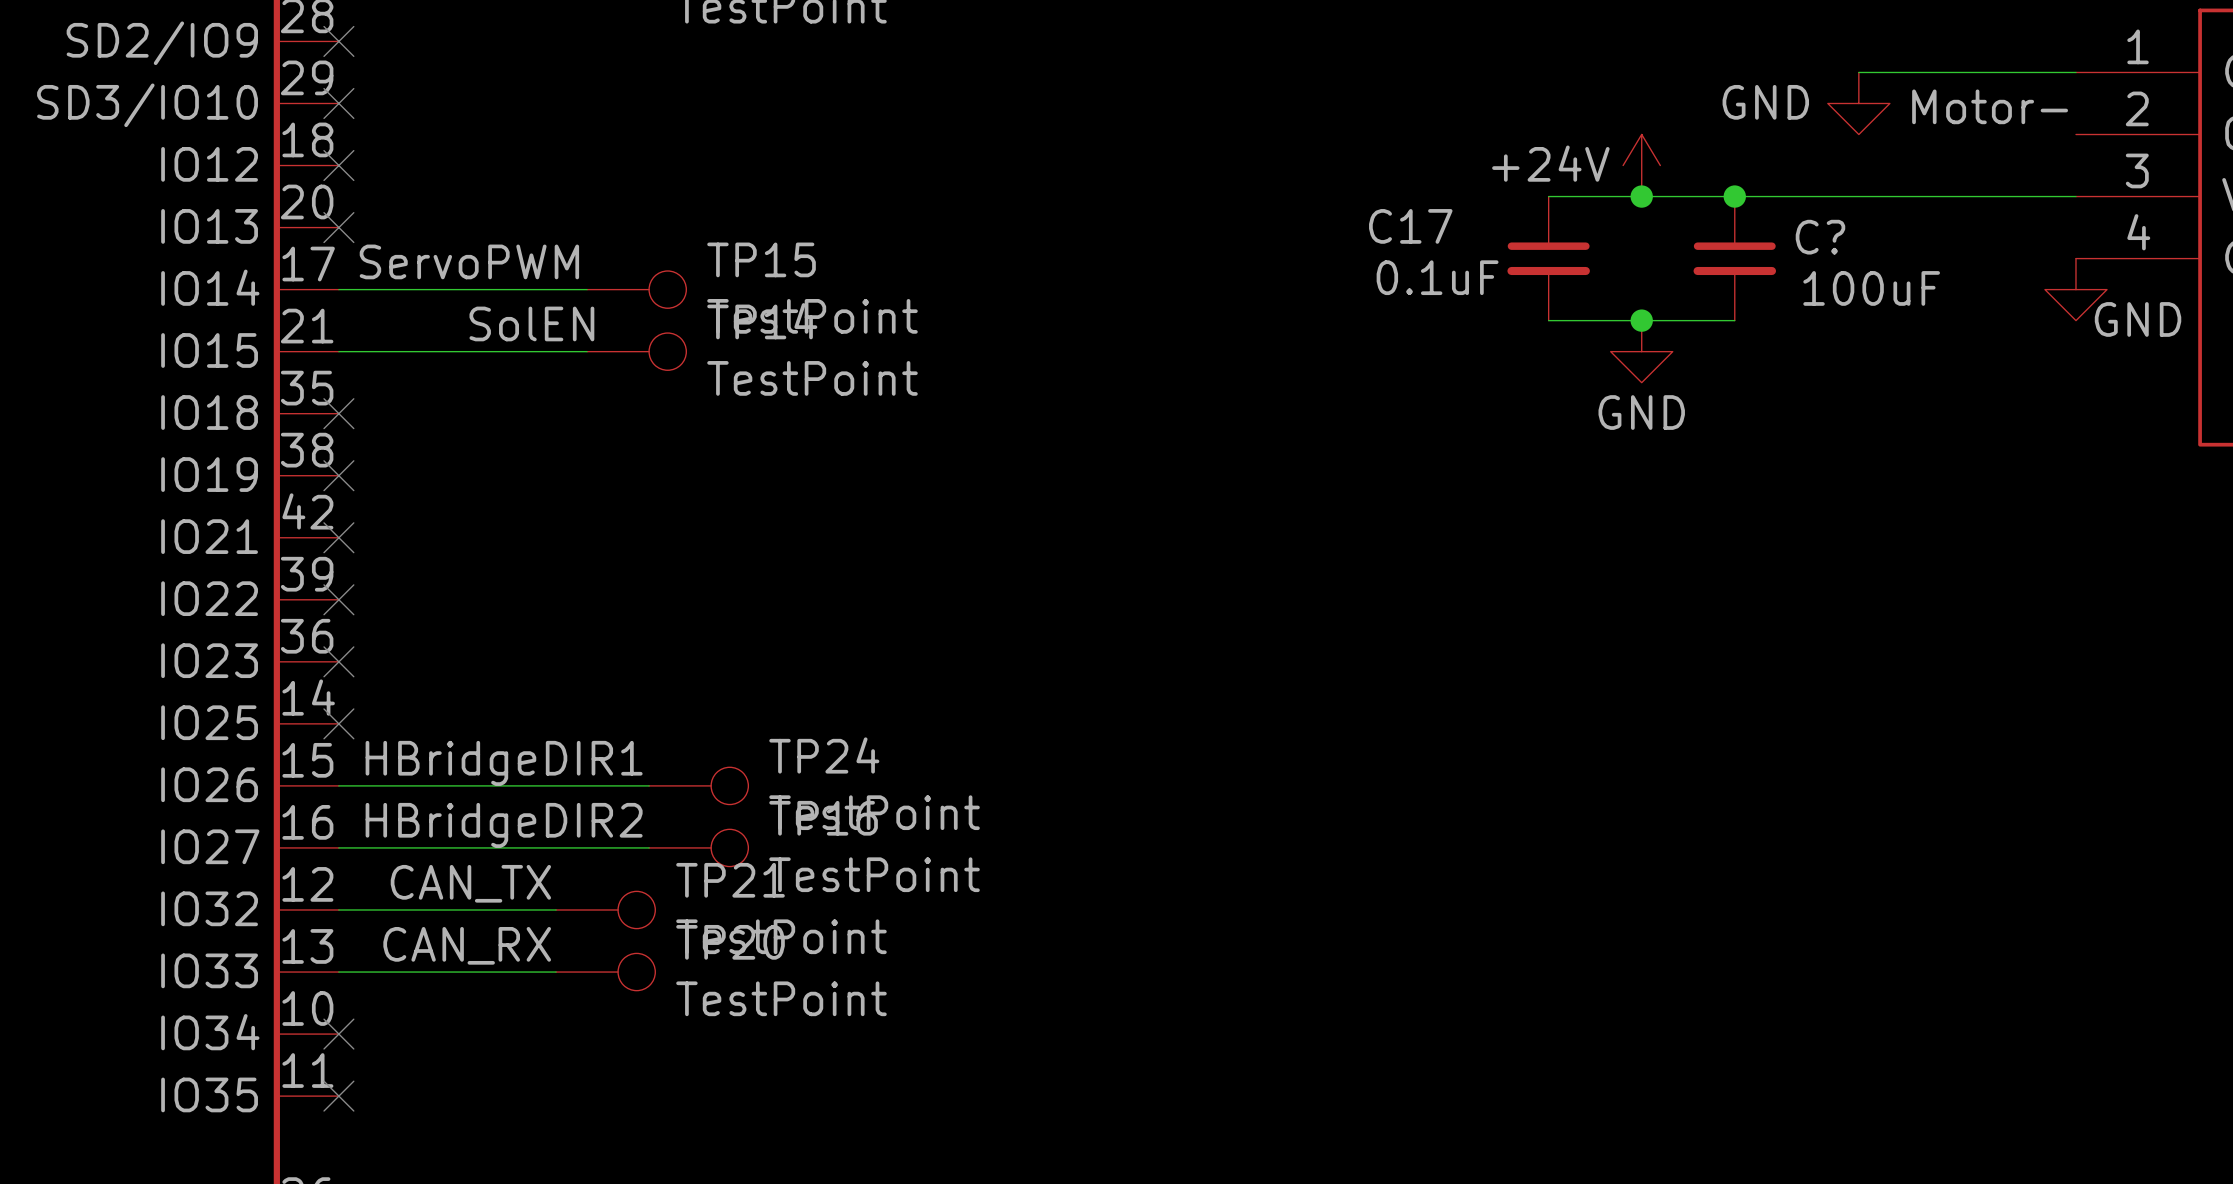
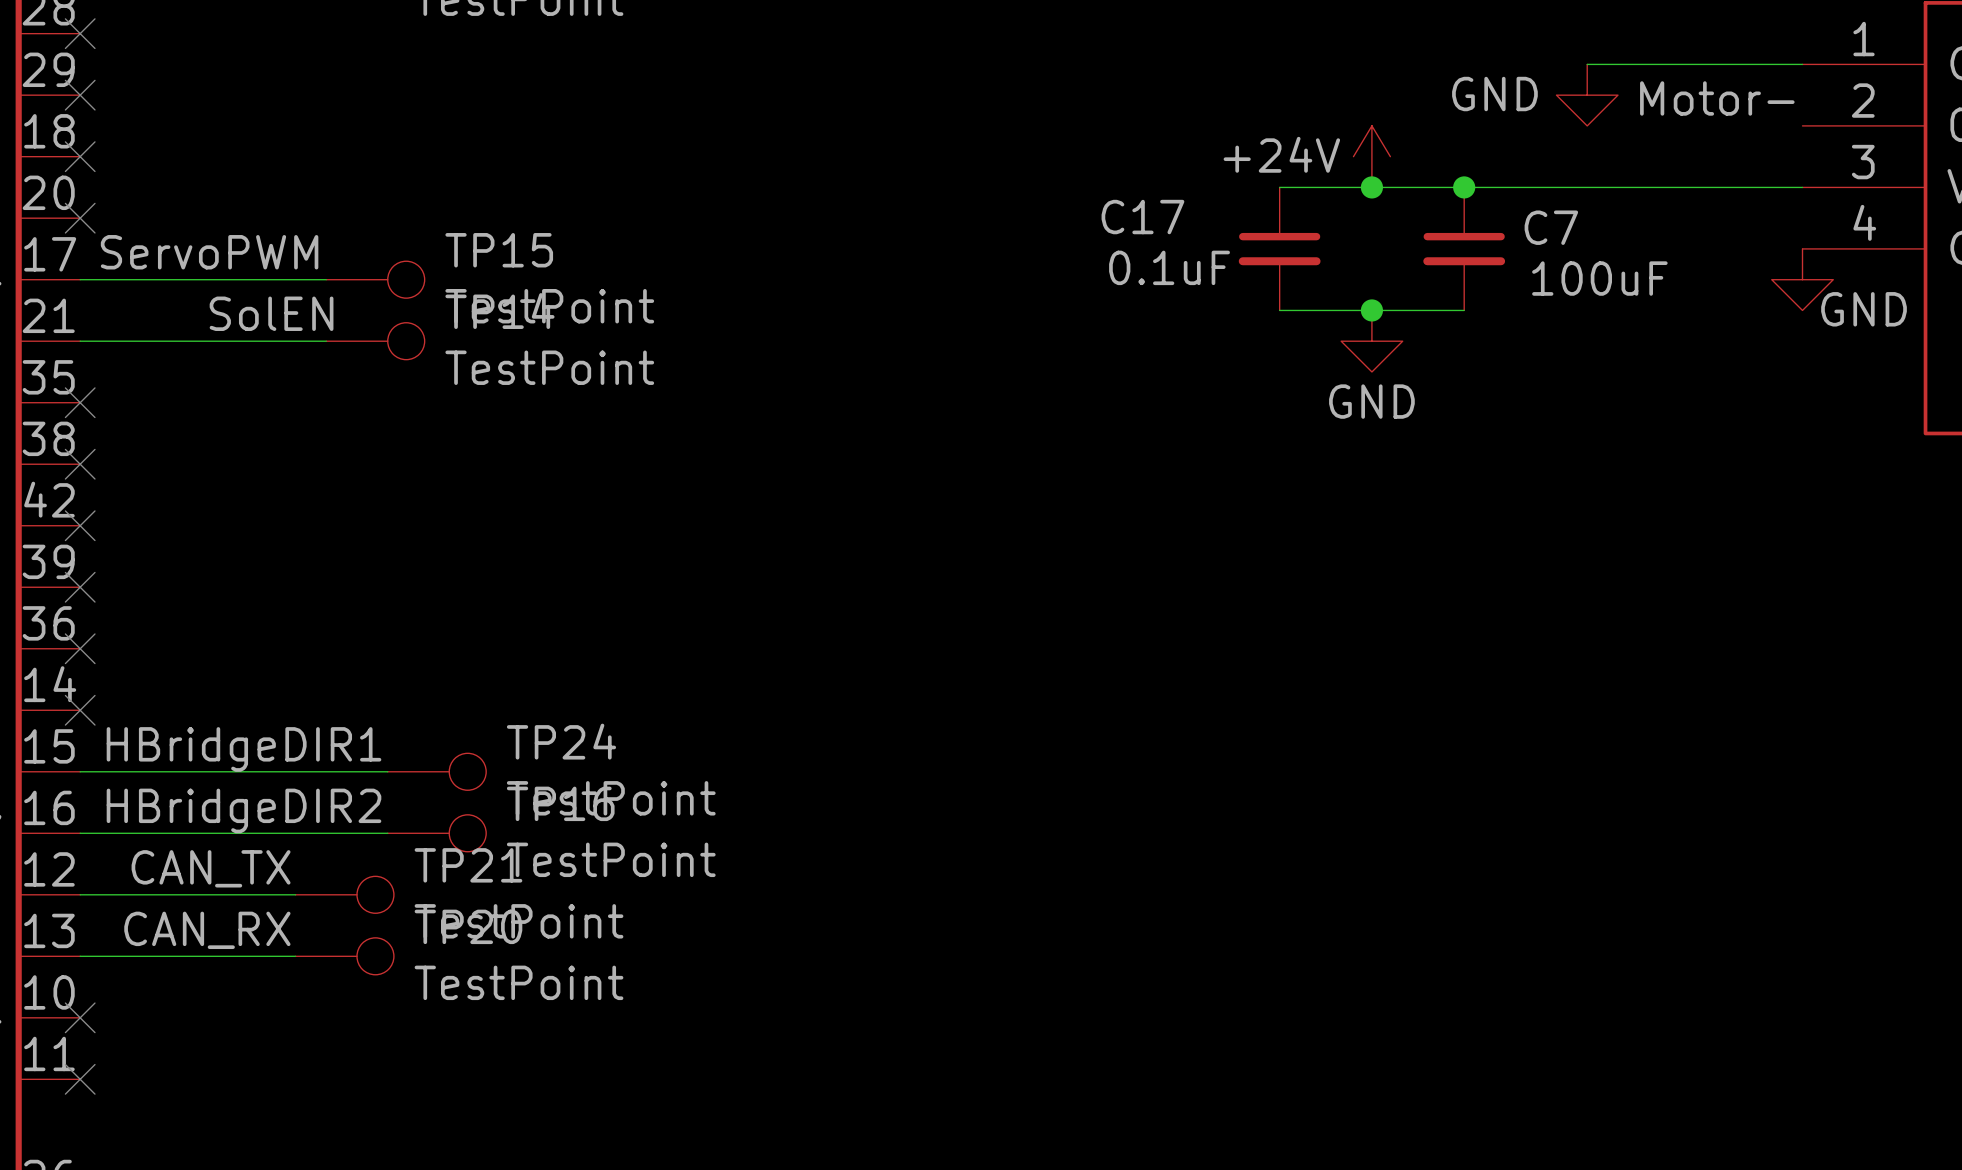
C? name: C? (1820, 237) -> C7 (1551, 227)

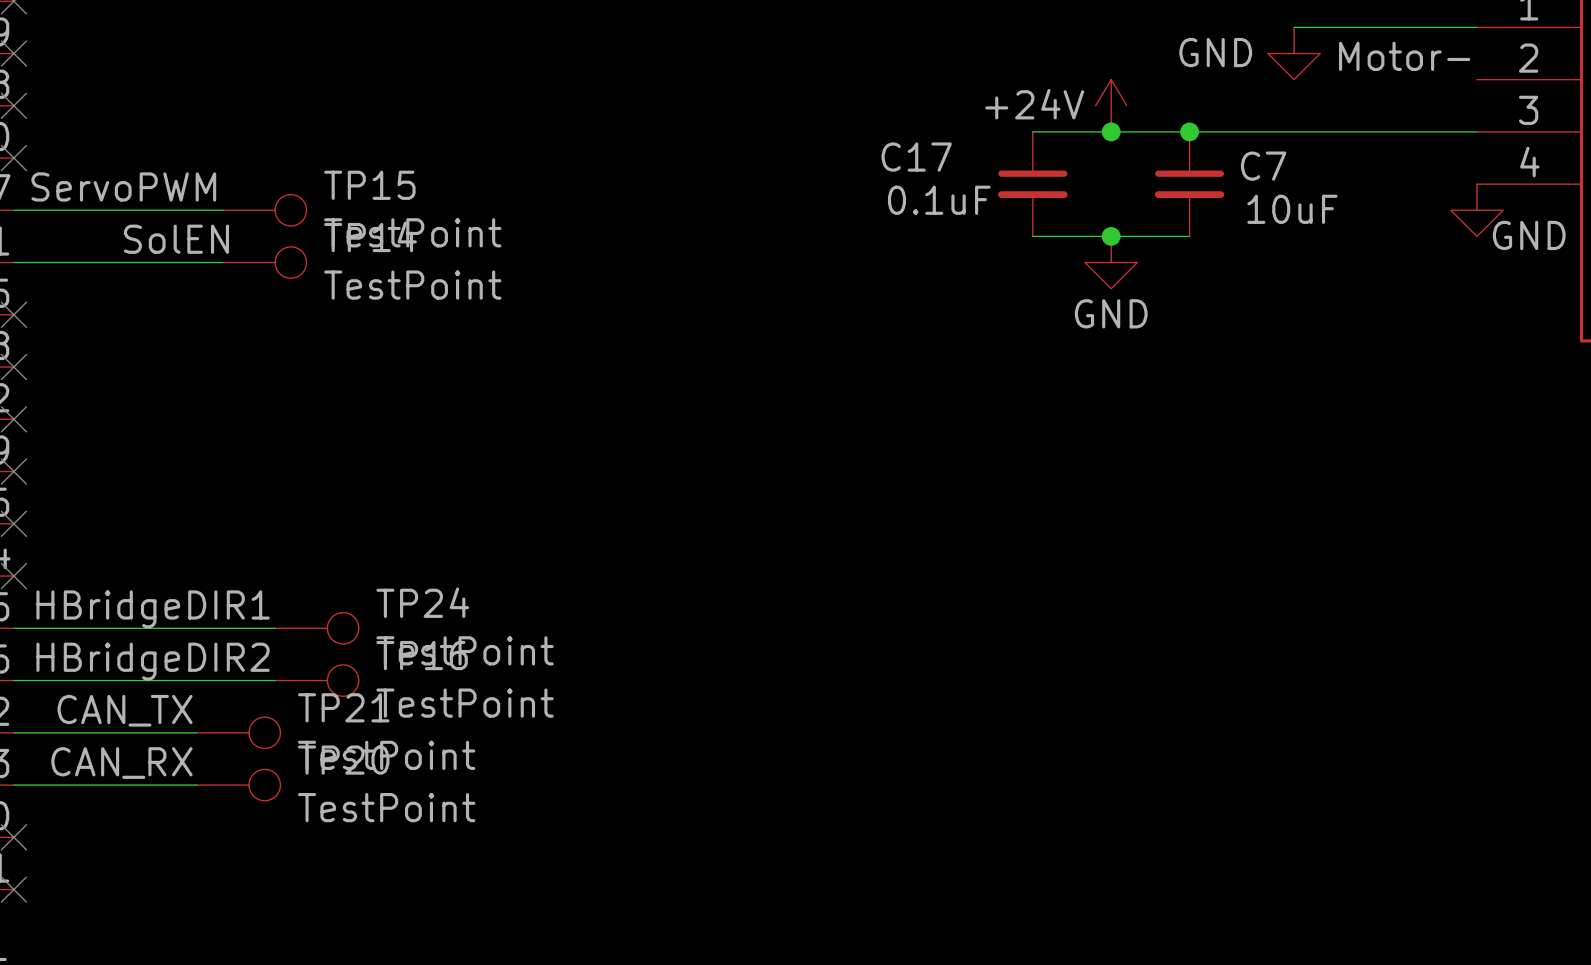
C7 value: 100uF (1599, 278) -> 10uF (1292, 209)

